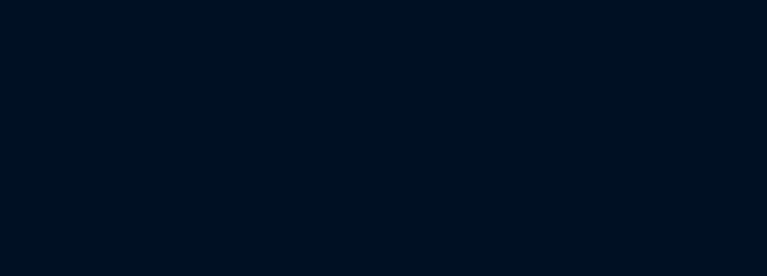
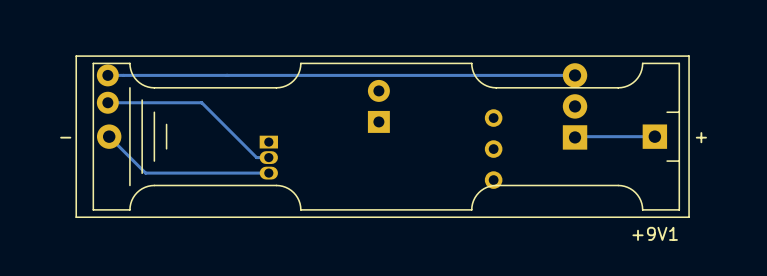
part: none -> (107, 75)
part: none -> (107, 102)
track: none -> (108, 102) (201, 102) (256, 157) (268, 157)
part: none -> (378, 106)
part: none -> (575, 106)
track: none -> (109, 136) (145, 173) (268, 173)
+9V1: none -> (382, 136)
track: none -> (654, 136) (575, 137)
part: none -> (493, 149)
part: none -> (268, 157)

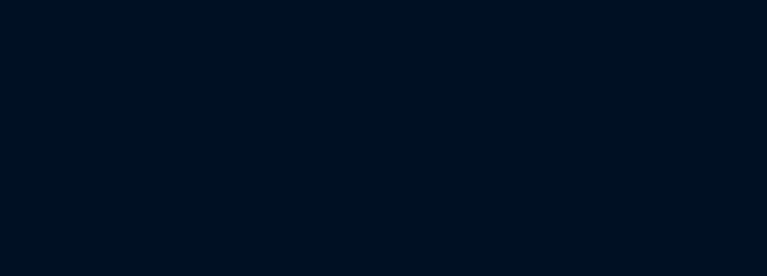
part: (107, 75) -> none
part: (107, 102) -> none
track: (108, 102) (201, 102) (256, 157) (268, 157) -> none
part: (378, 106) -> none
part: (575, 106) -> none
track: (109, 136) (145, 173) (268, 173) -> none
+9V1: (382, 136) -> none
track: (654, 136) (575, 137) -> none
part: (493, 149) -> none
part: (268, 157) -> none

